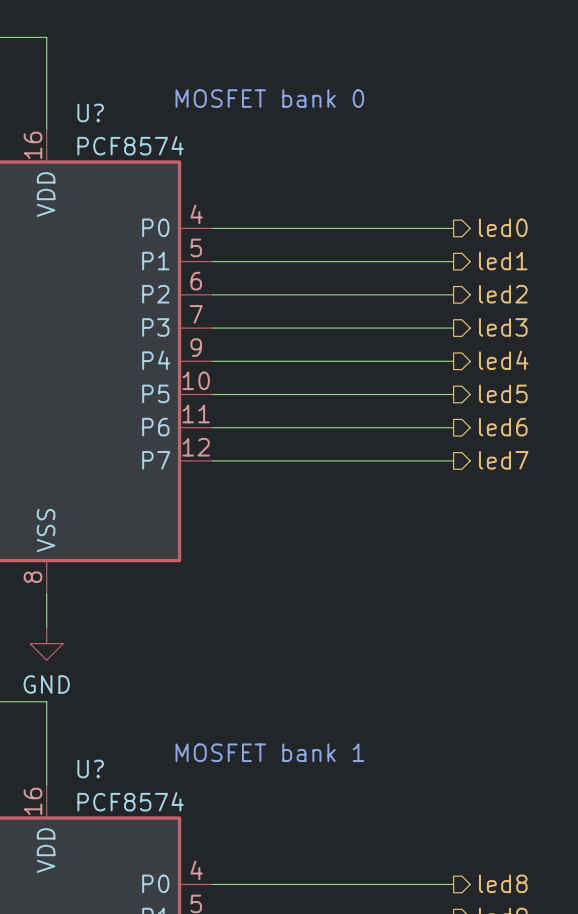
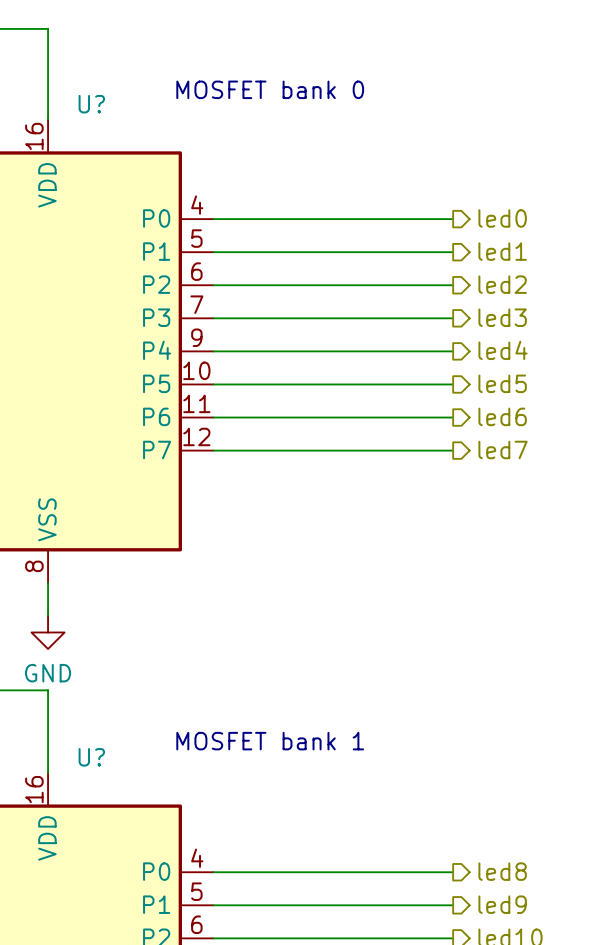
U? value: PCF8574 (130, 145) -> none
U? value: PCF8574 (130, 801) -> none

